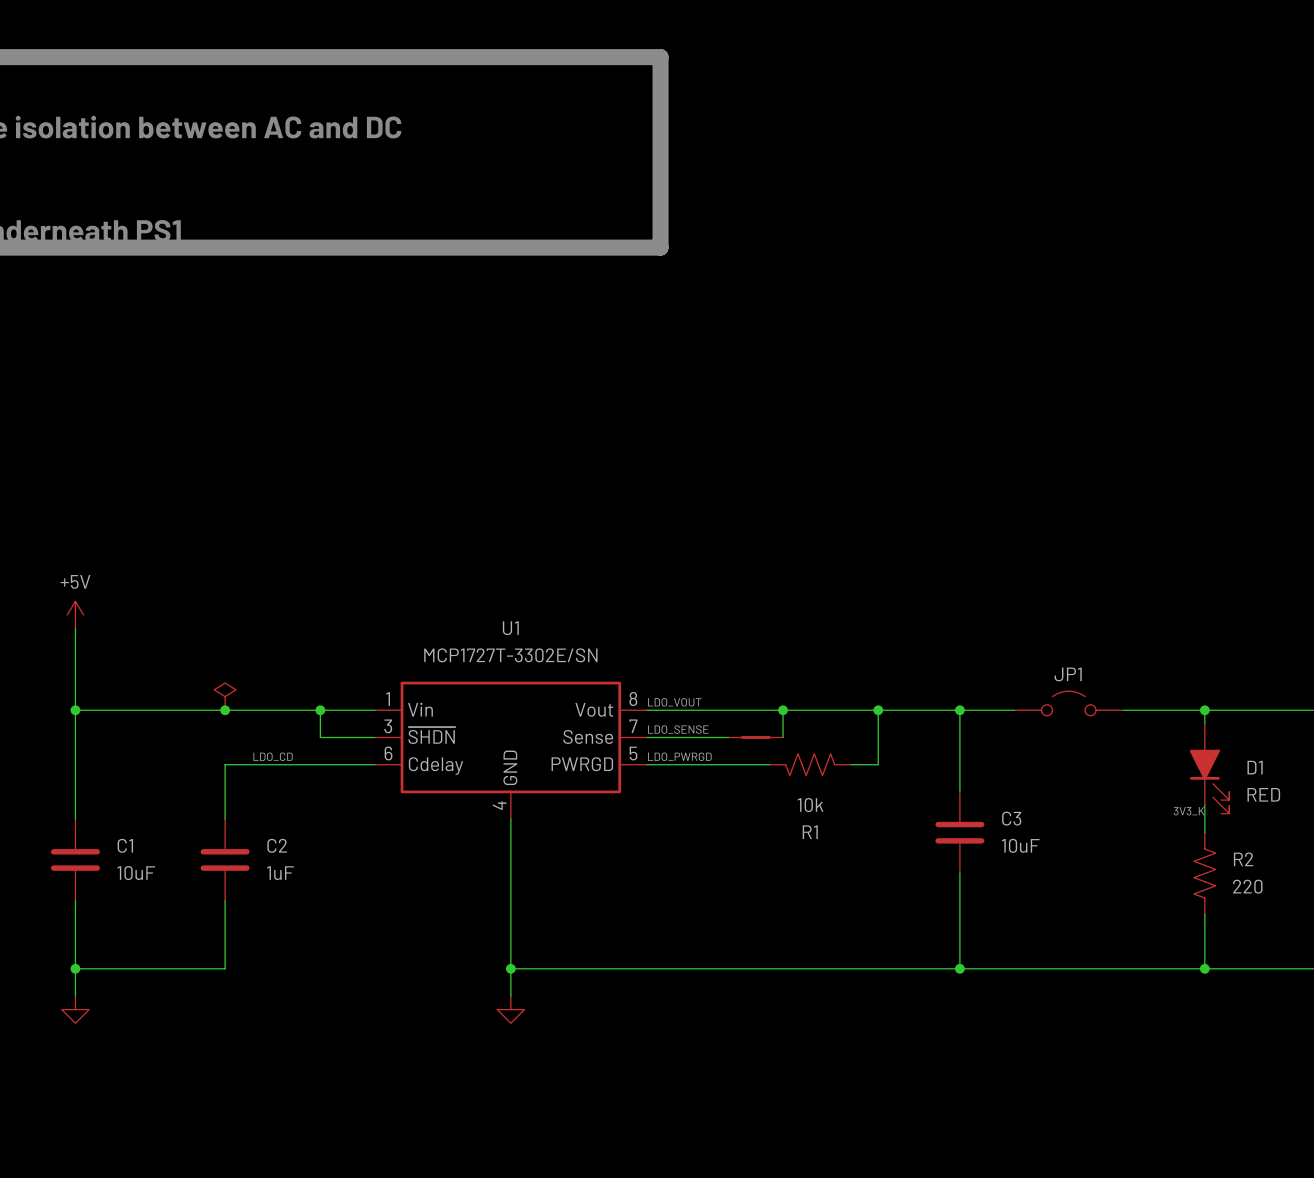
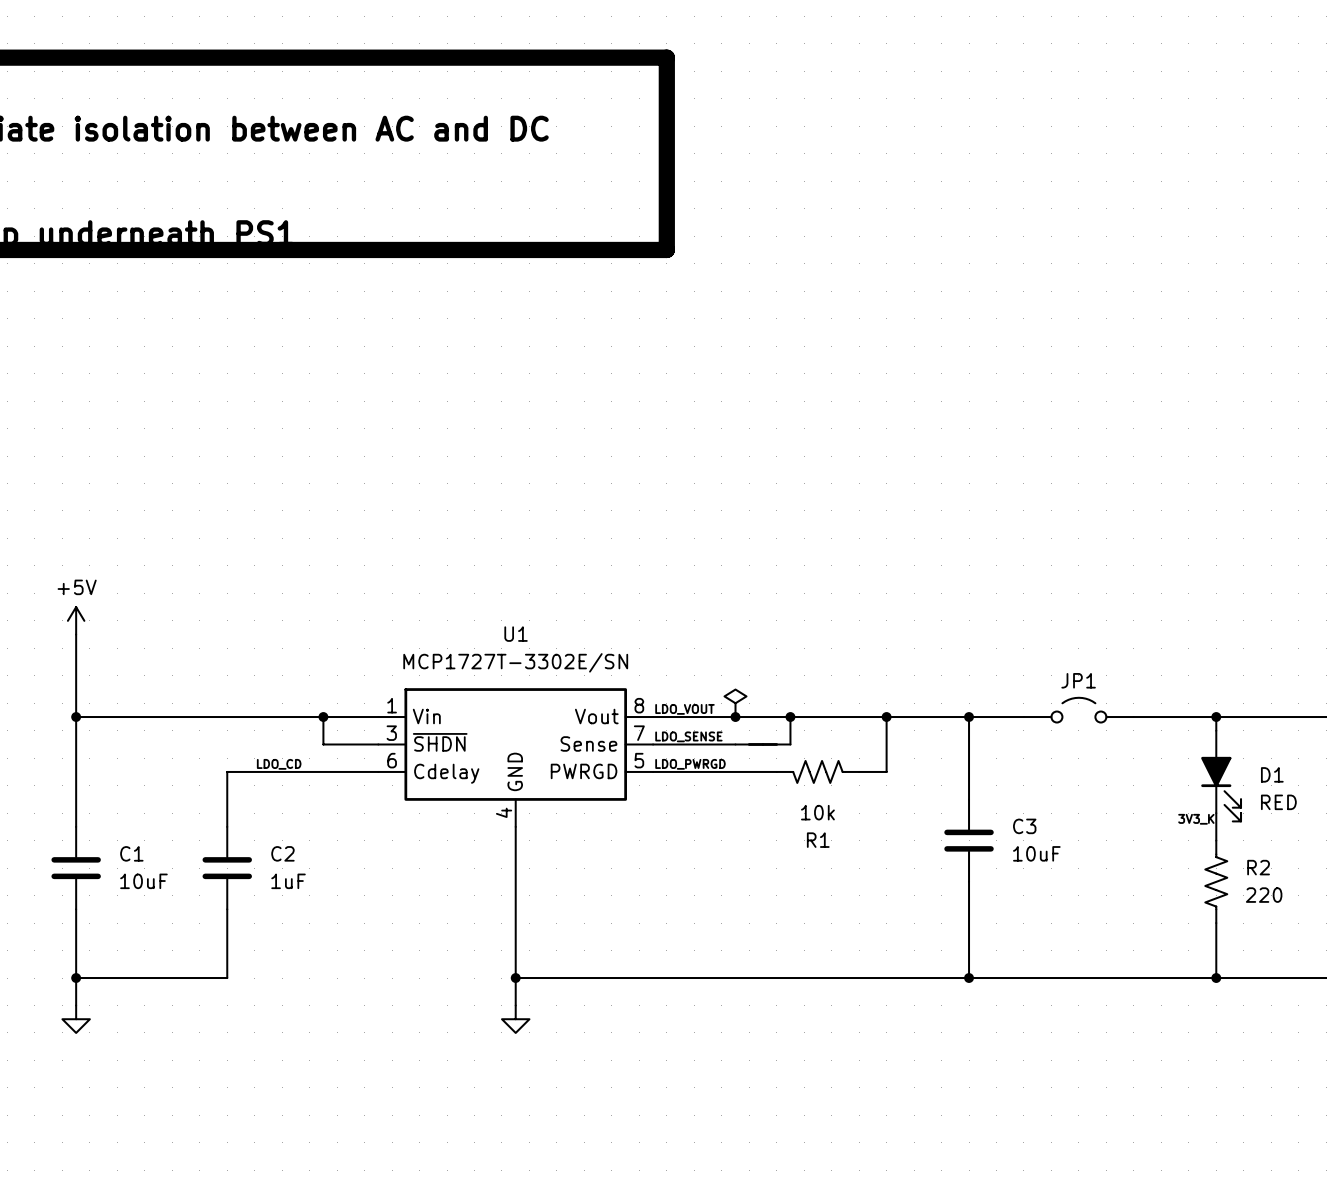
power symbol: (225, 696) -> none
power symbol: none -> (735, 703)
junction: (225, 710) -> none
junction: none -> (735, 717)

